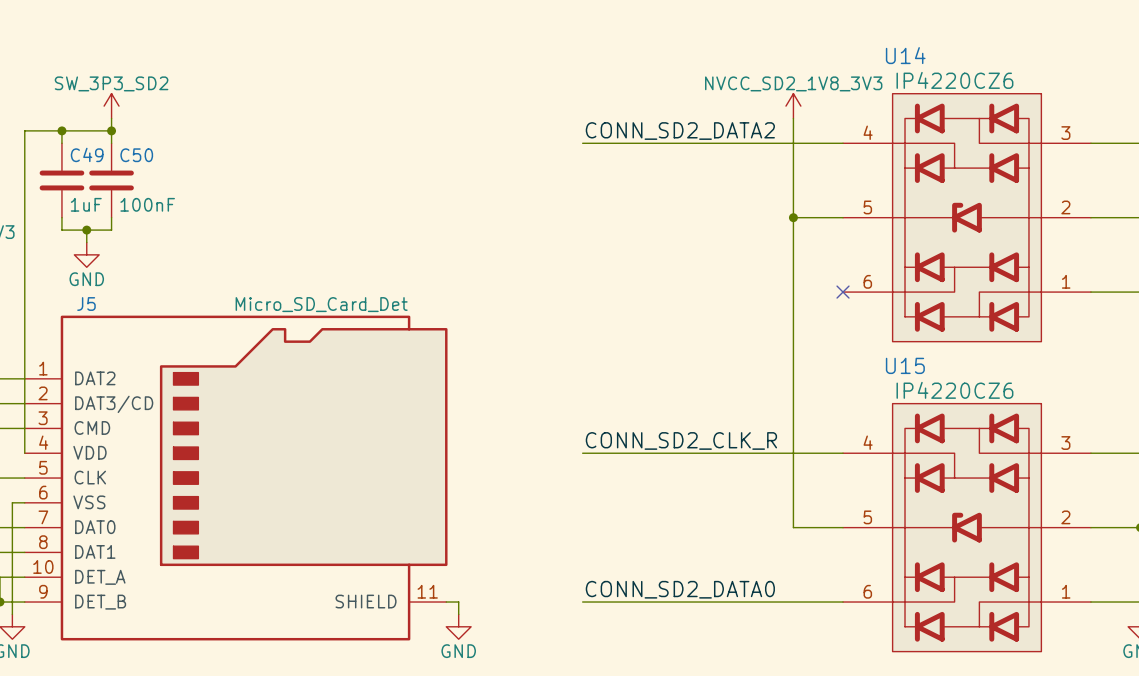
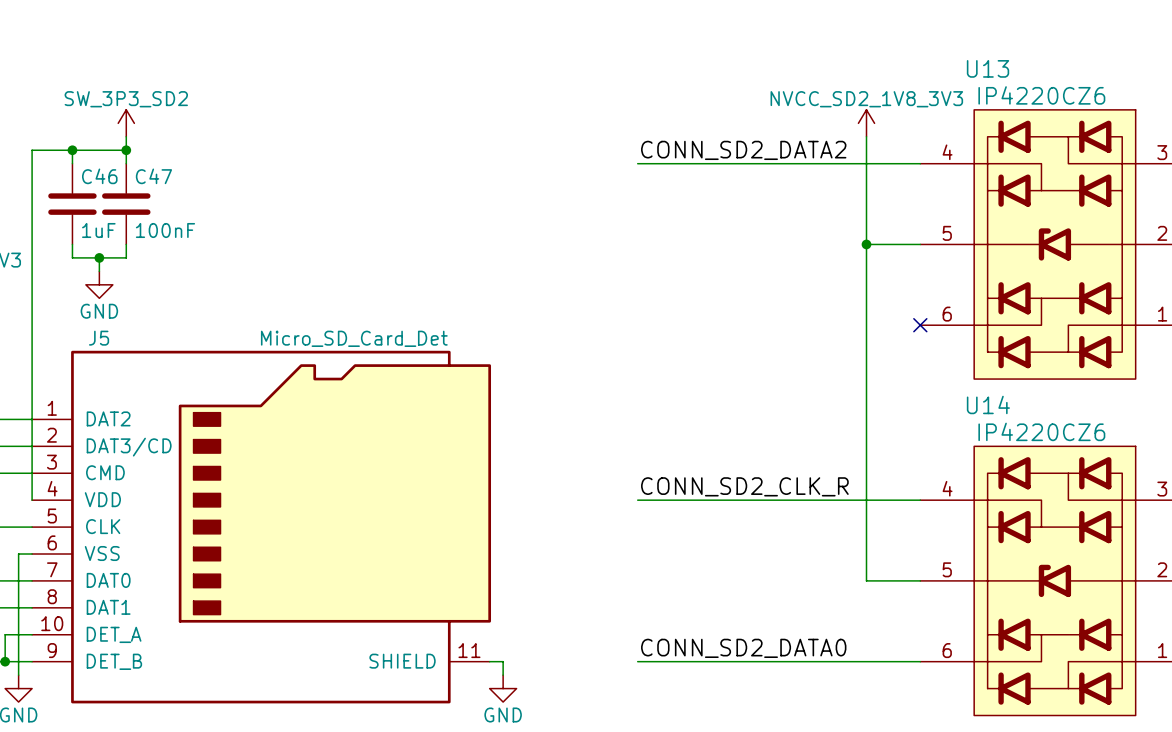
U14 name: U14 (905, 55) -> U13 (988, 68)
C49 name: C49 (87, 154) -> C46 (99, 176)
C50 name: C50 (136, 155) -> C47 (153, 176)
U15 name: U15 (905, 365) -> U14 (988, 404)

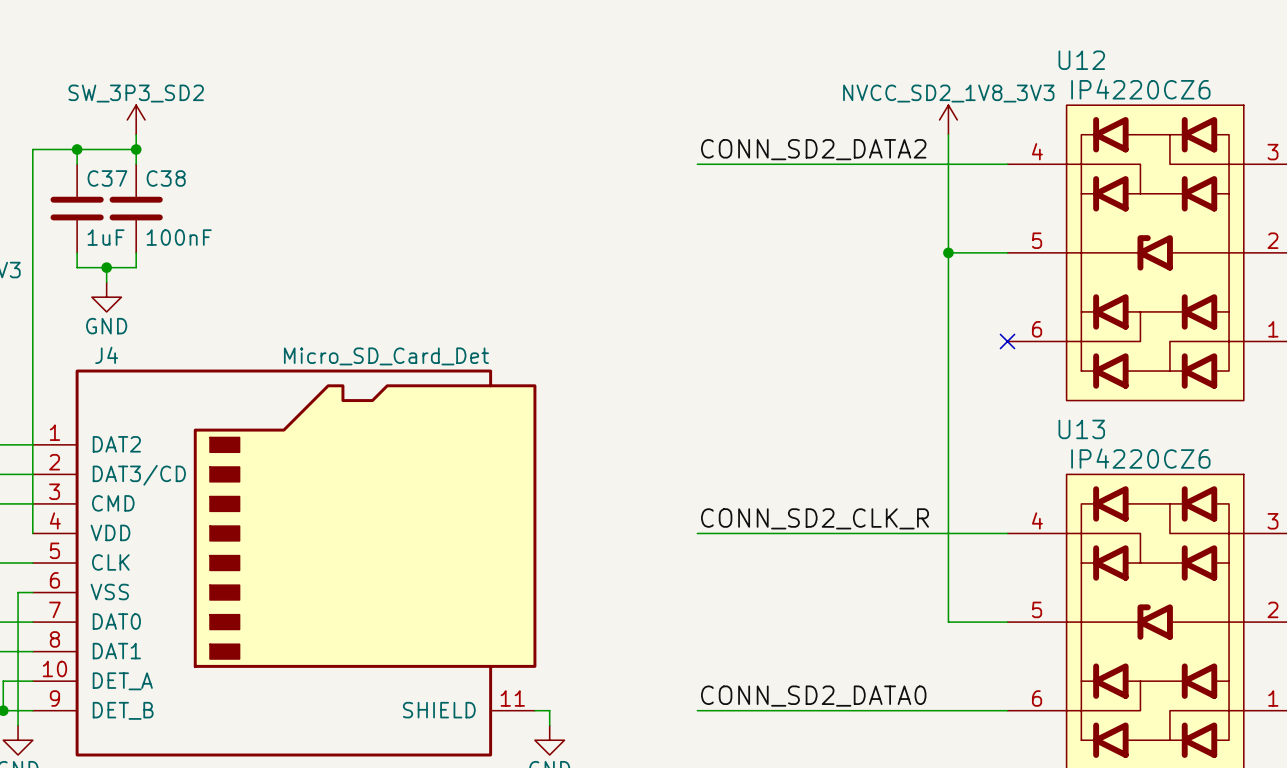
U13 name: U13 (988, 68) -> U12 (1081, 60)
C46 name: C46 (99, 176) -> C37 (107, 178)
C47 name: C47 (153, 176) -> C38 (166, 178)
J5 name: J5 (99, 338) -> J4 (106, 355)
U14 name: U14 (988, 404) -> U13 (1081, 429)

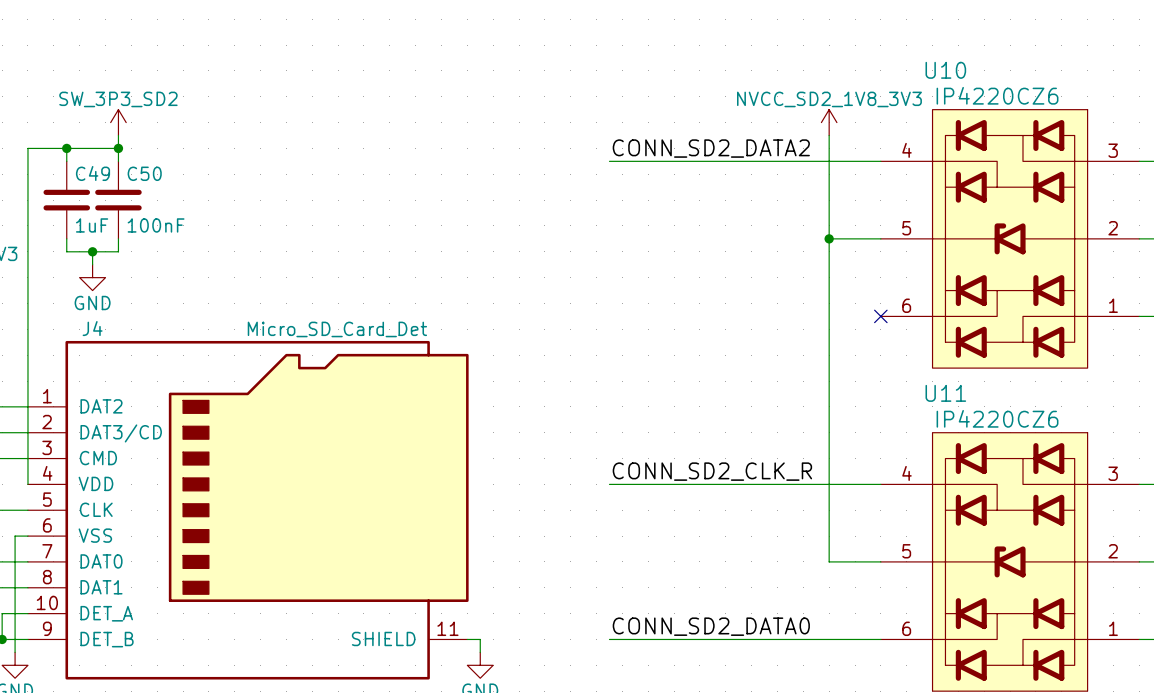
U12 name: U12 (1081, 60) -> U10 (945, 70)
C37 name: C37 (107, 178) -> C49 (93, 173)
C38 name: C38 (166, 178) -> C50 (144, 173)
U13 name: U13 (1081, 429) -> U11 (945, 393)

